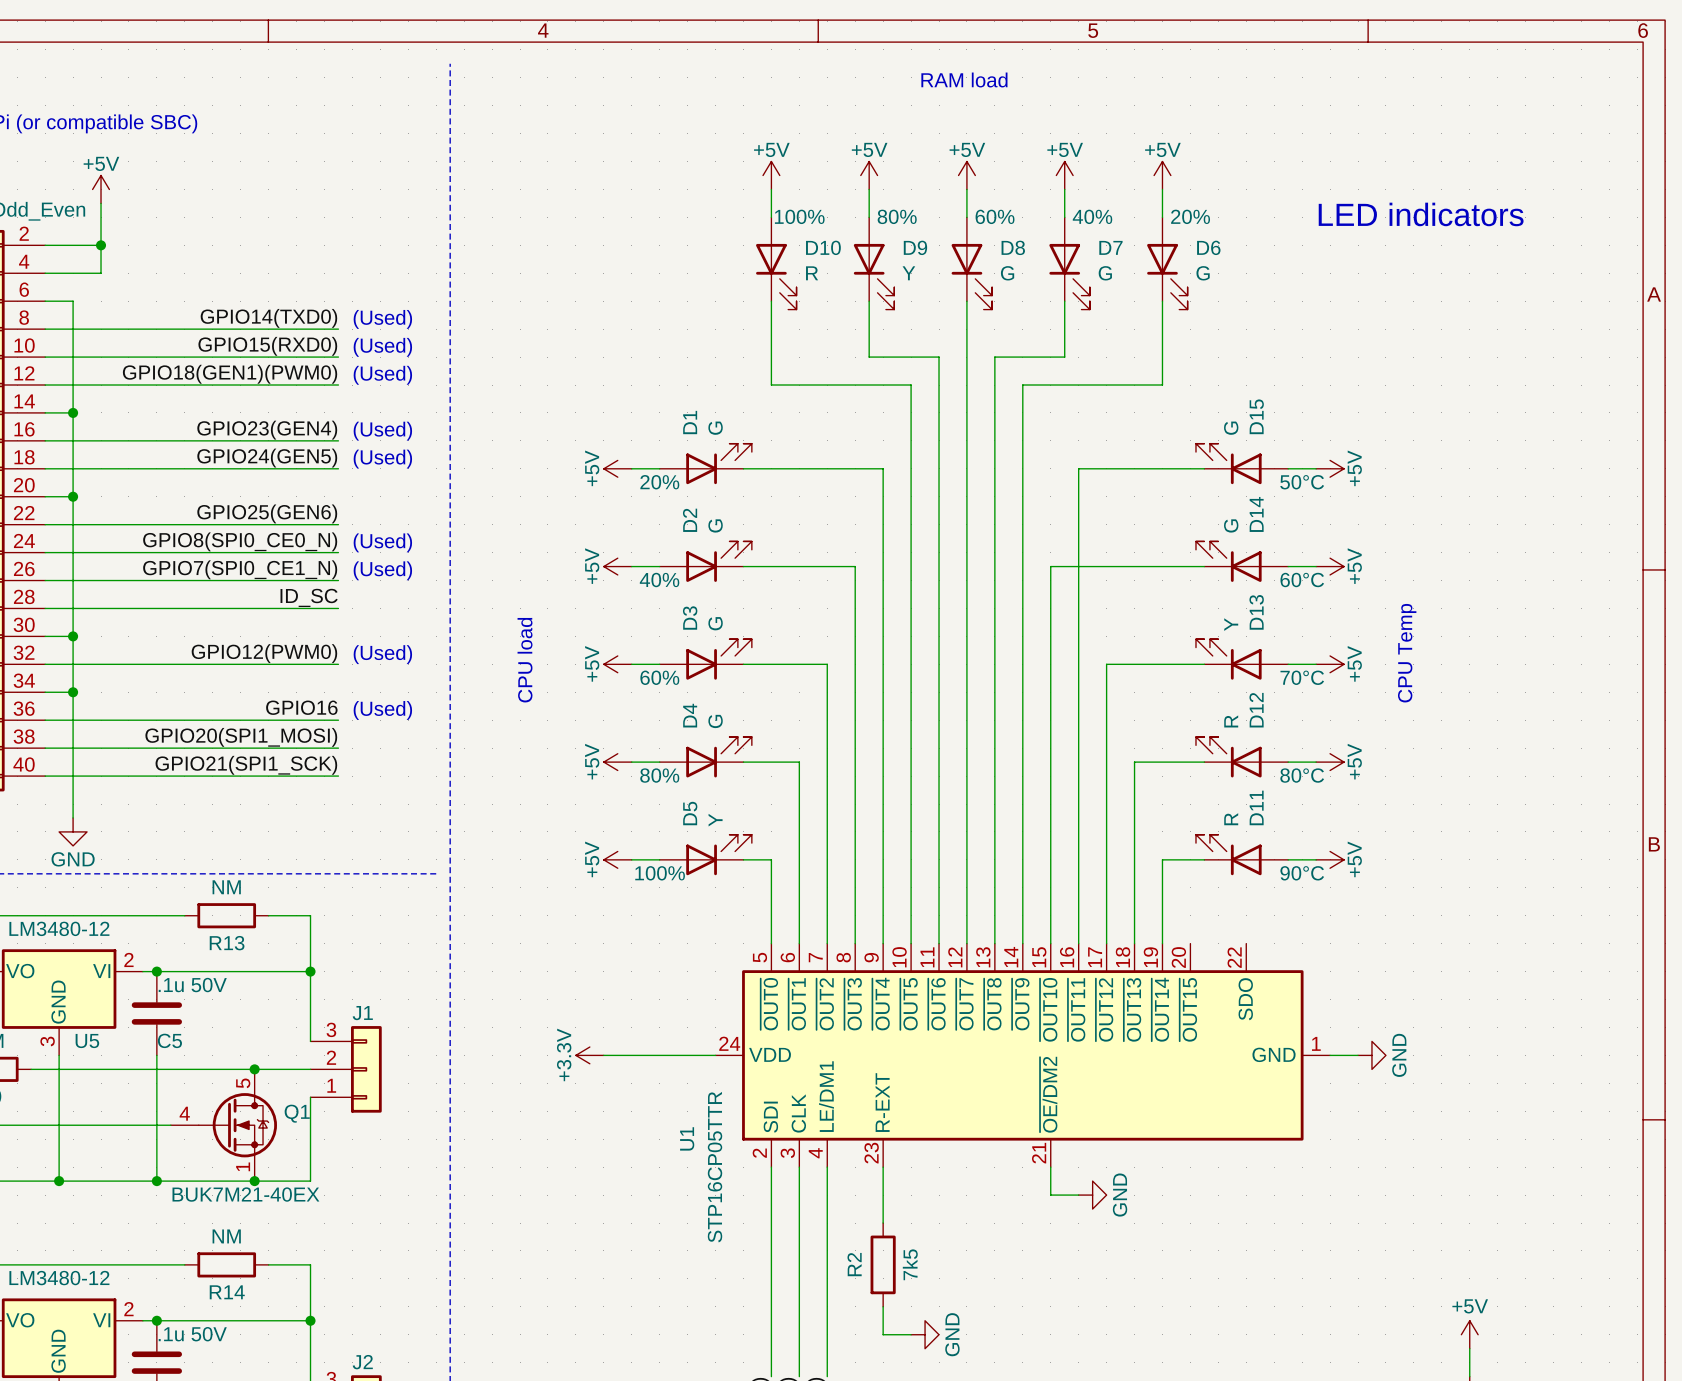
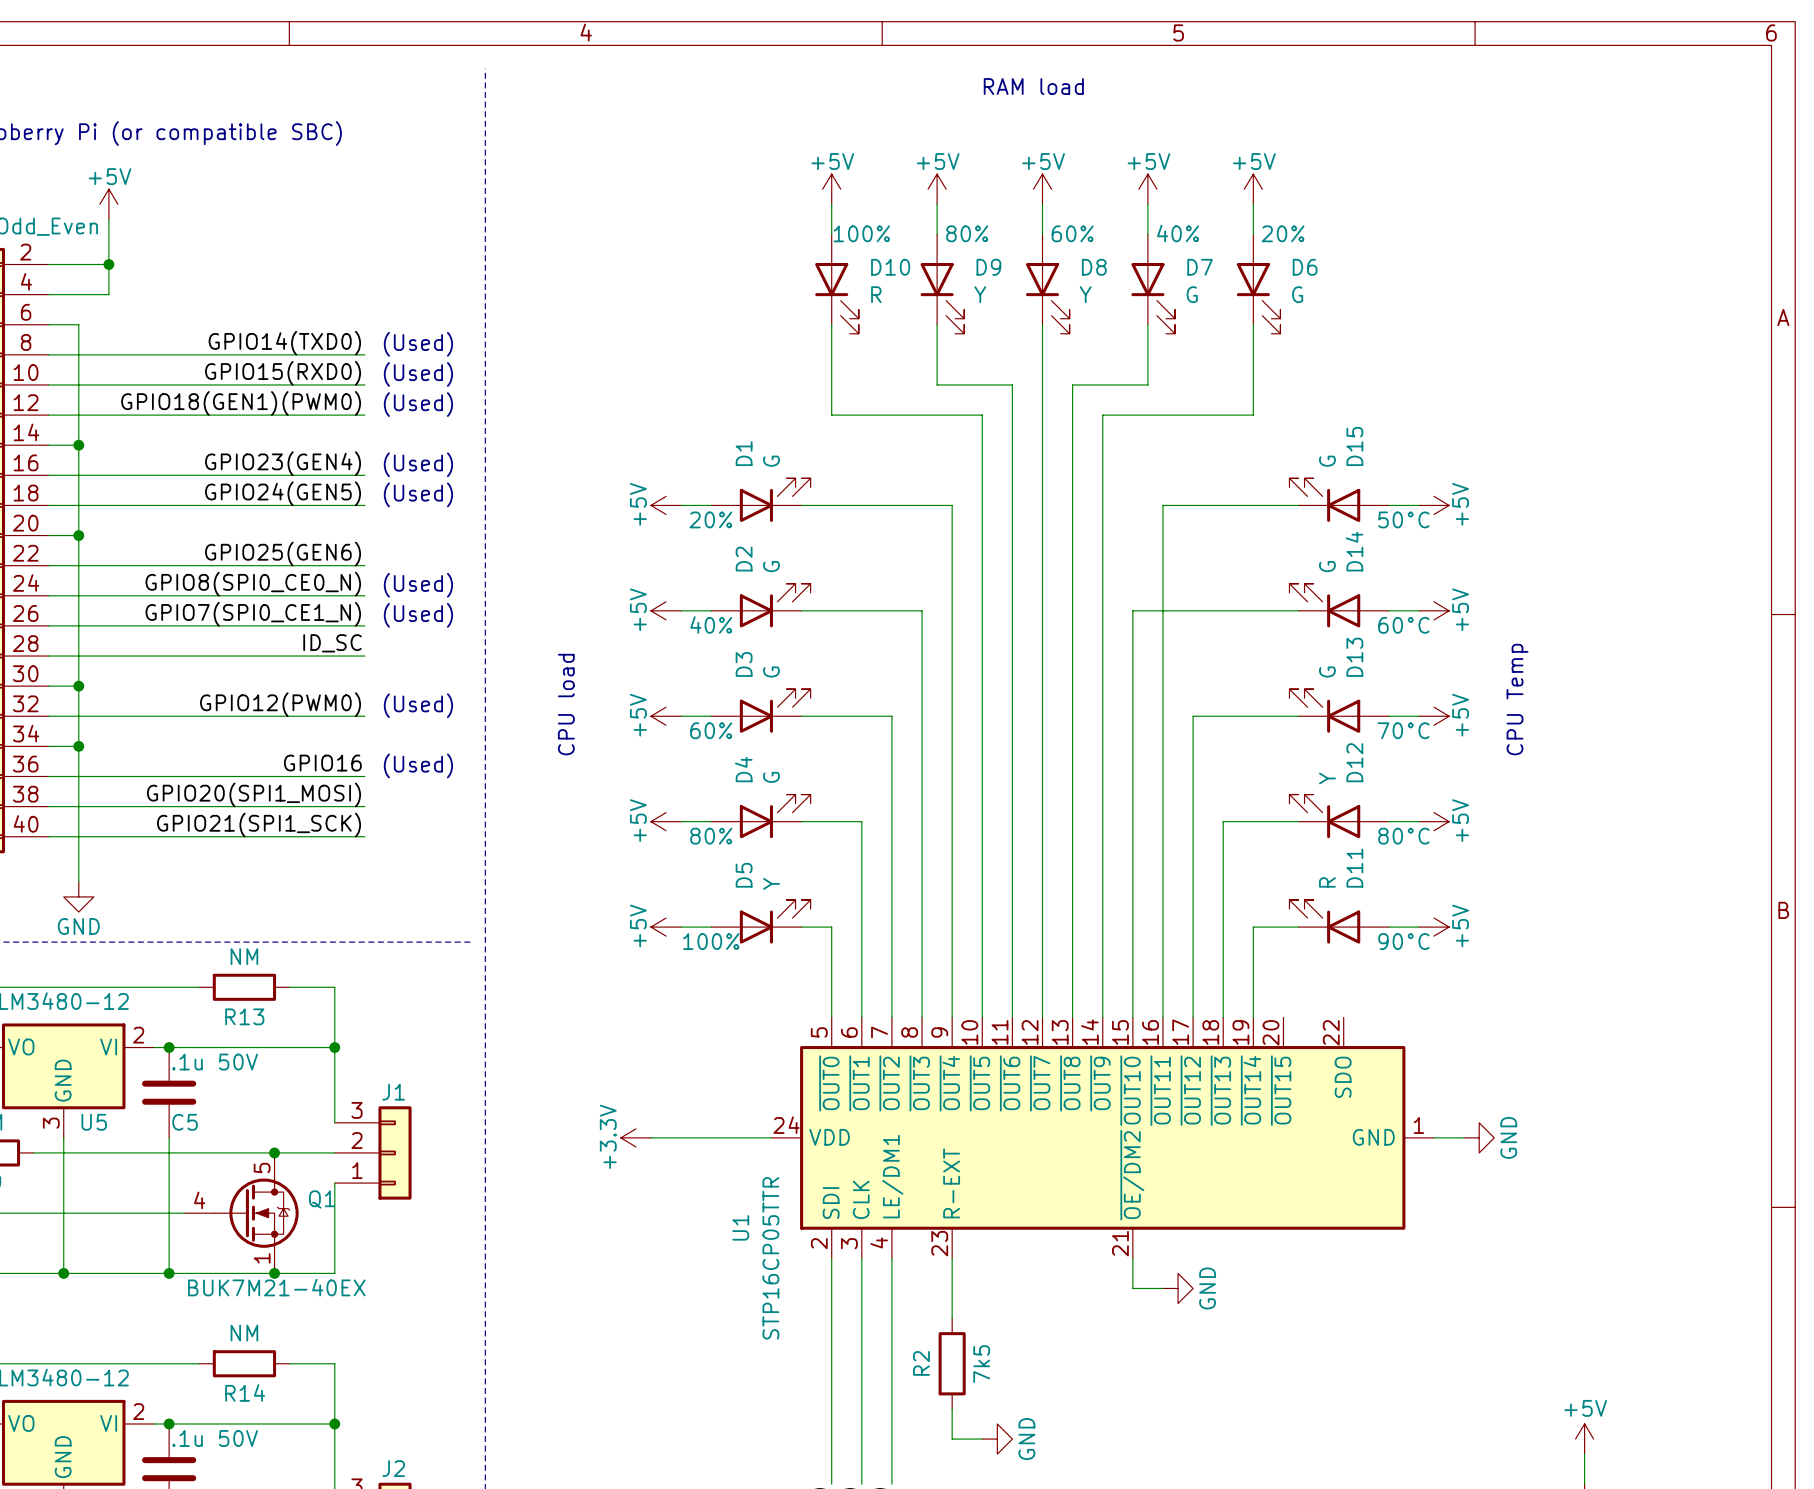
text: LED indicators (1421, 214) -> none
D8 value: G (1007, 273) -> Y (1085, 294)
D13 value: Y (1231, 624) -> G (1327, 672)
D12 value: R (1231, 721) -> Y (1327, 778)

